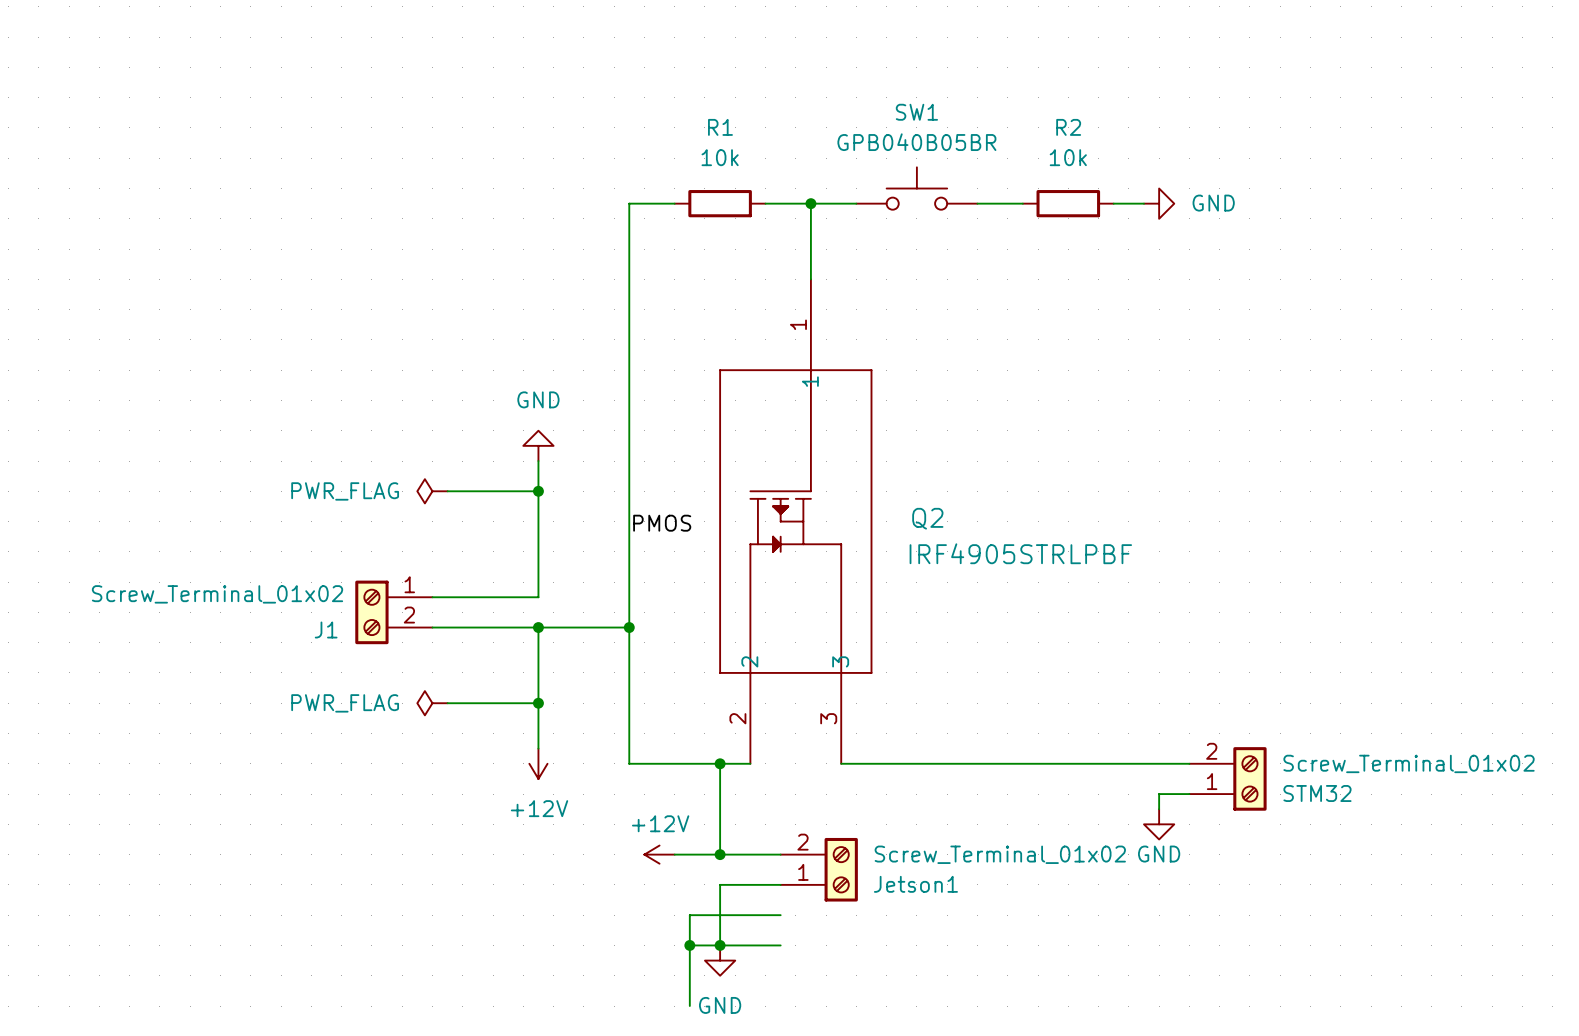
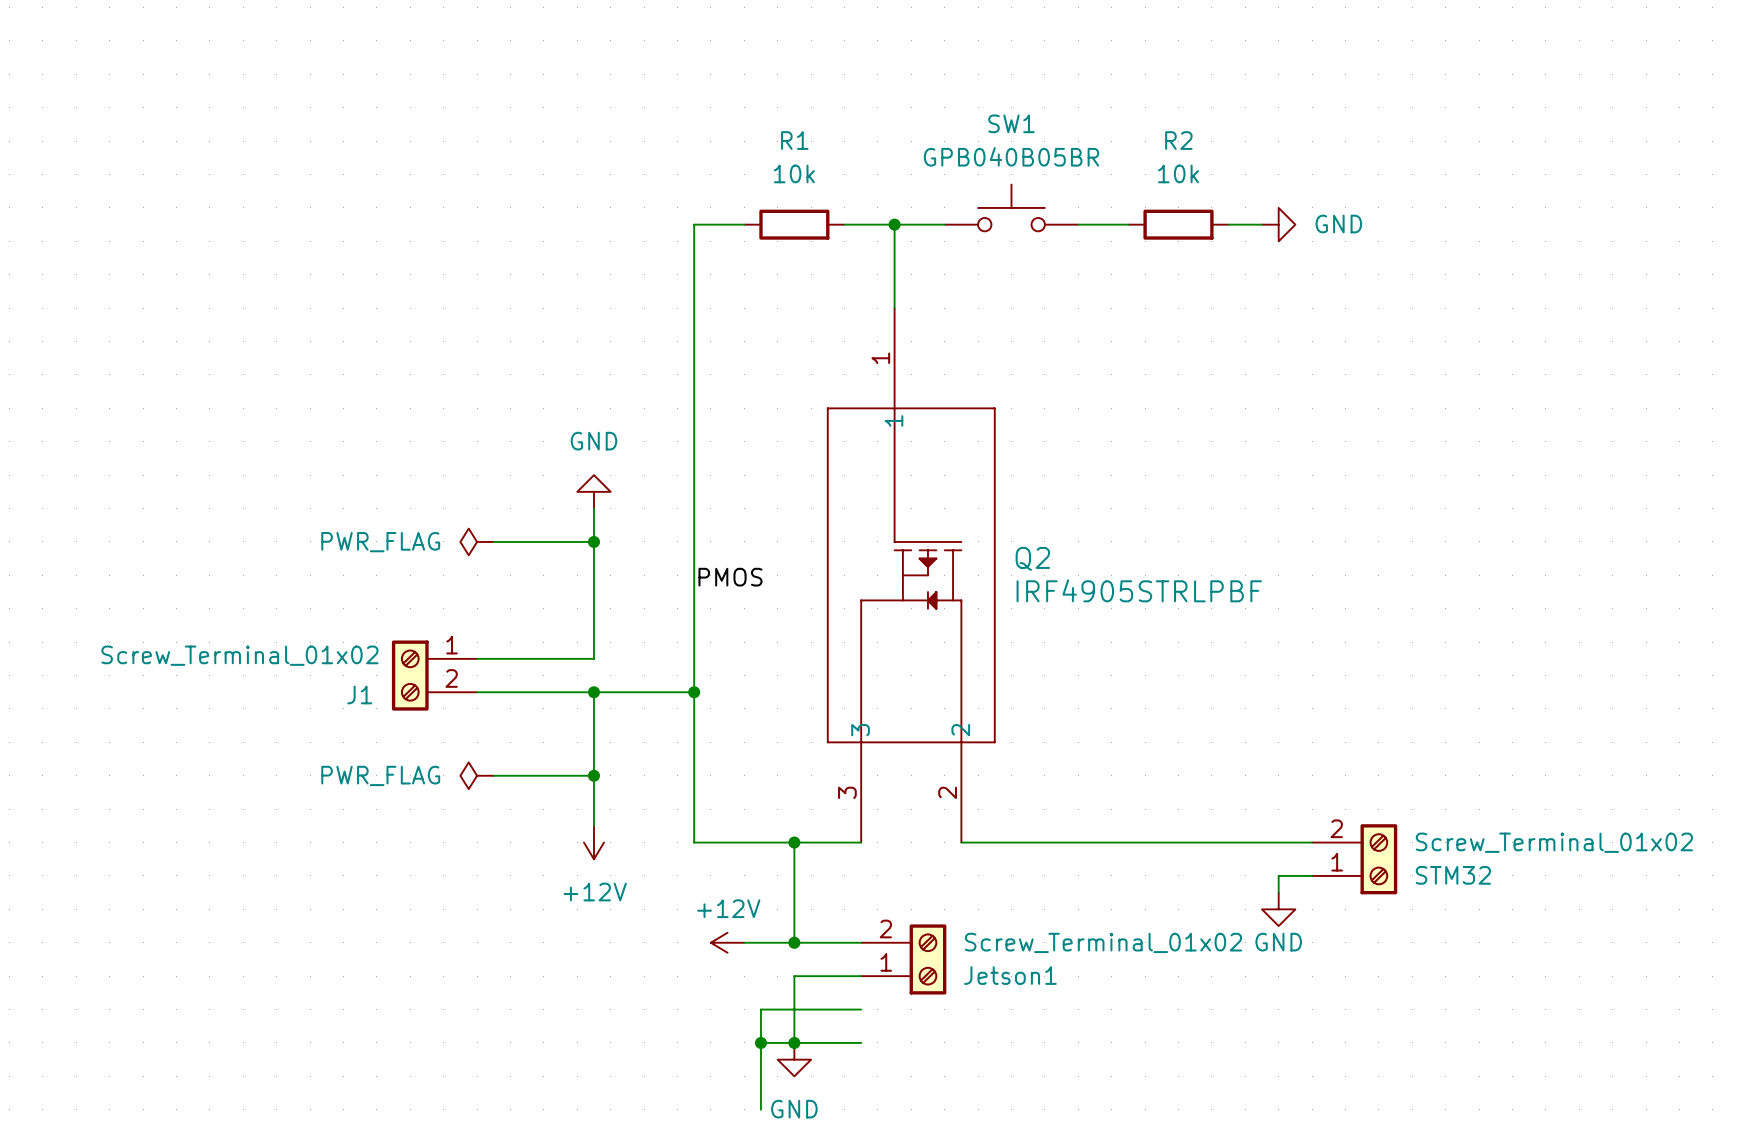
Q2 flip: as is (795, 521) -> left-right (911, 575)
wire: (841, 763) (871, 763) -> (827, 842) (861, 842)

